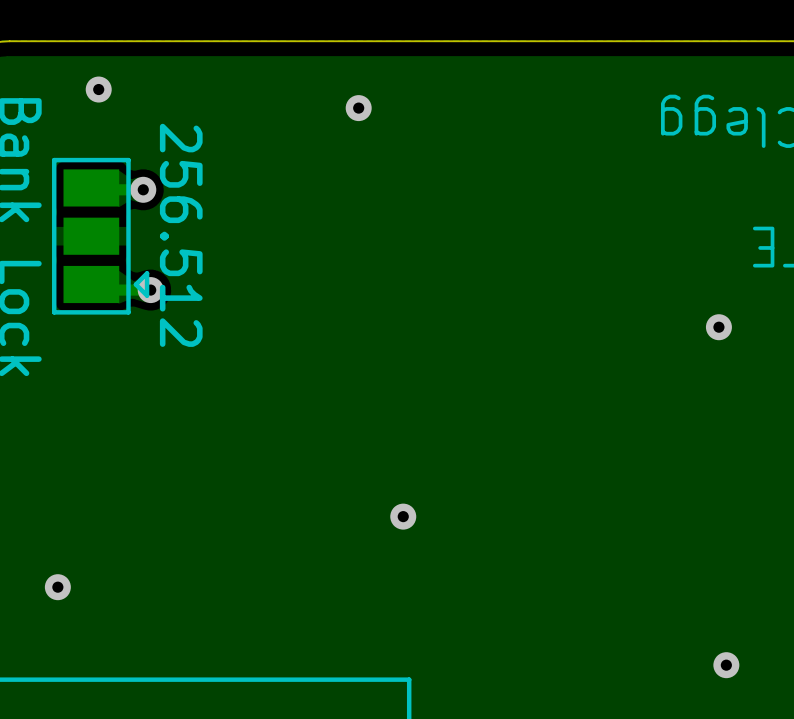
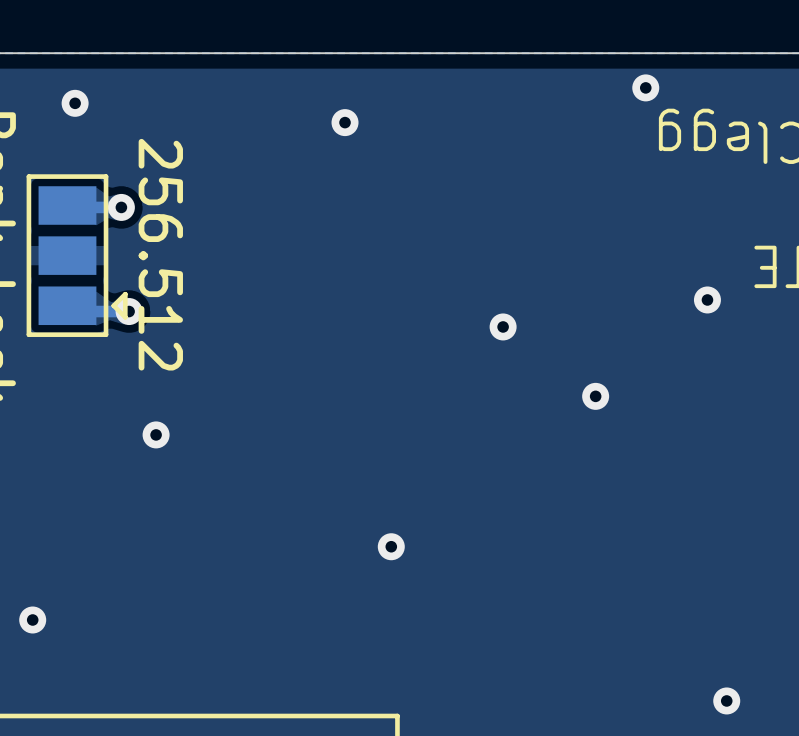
via: none -> (645, 87)
via: none -> (503, 326)
via position: (718, 327) -> (707, 299)
via: none -> (595, 396)
via: none -> (156, 434)

